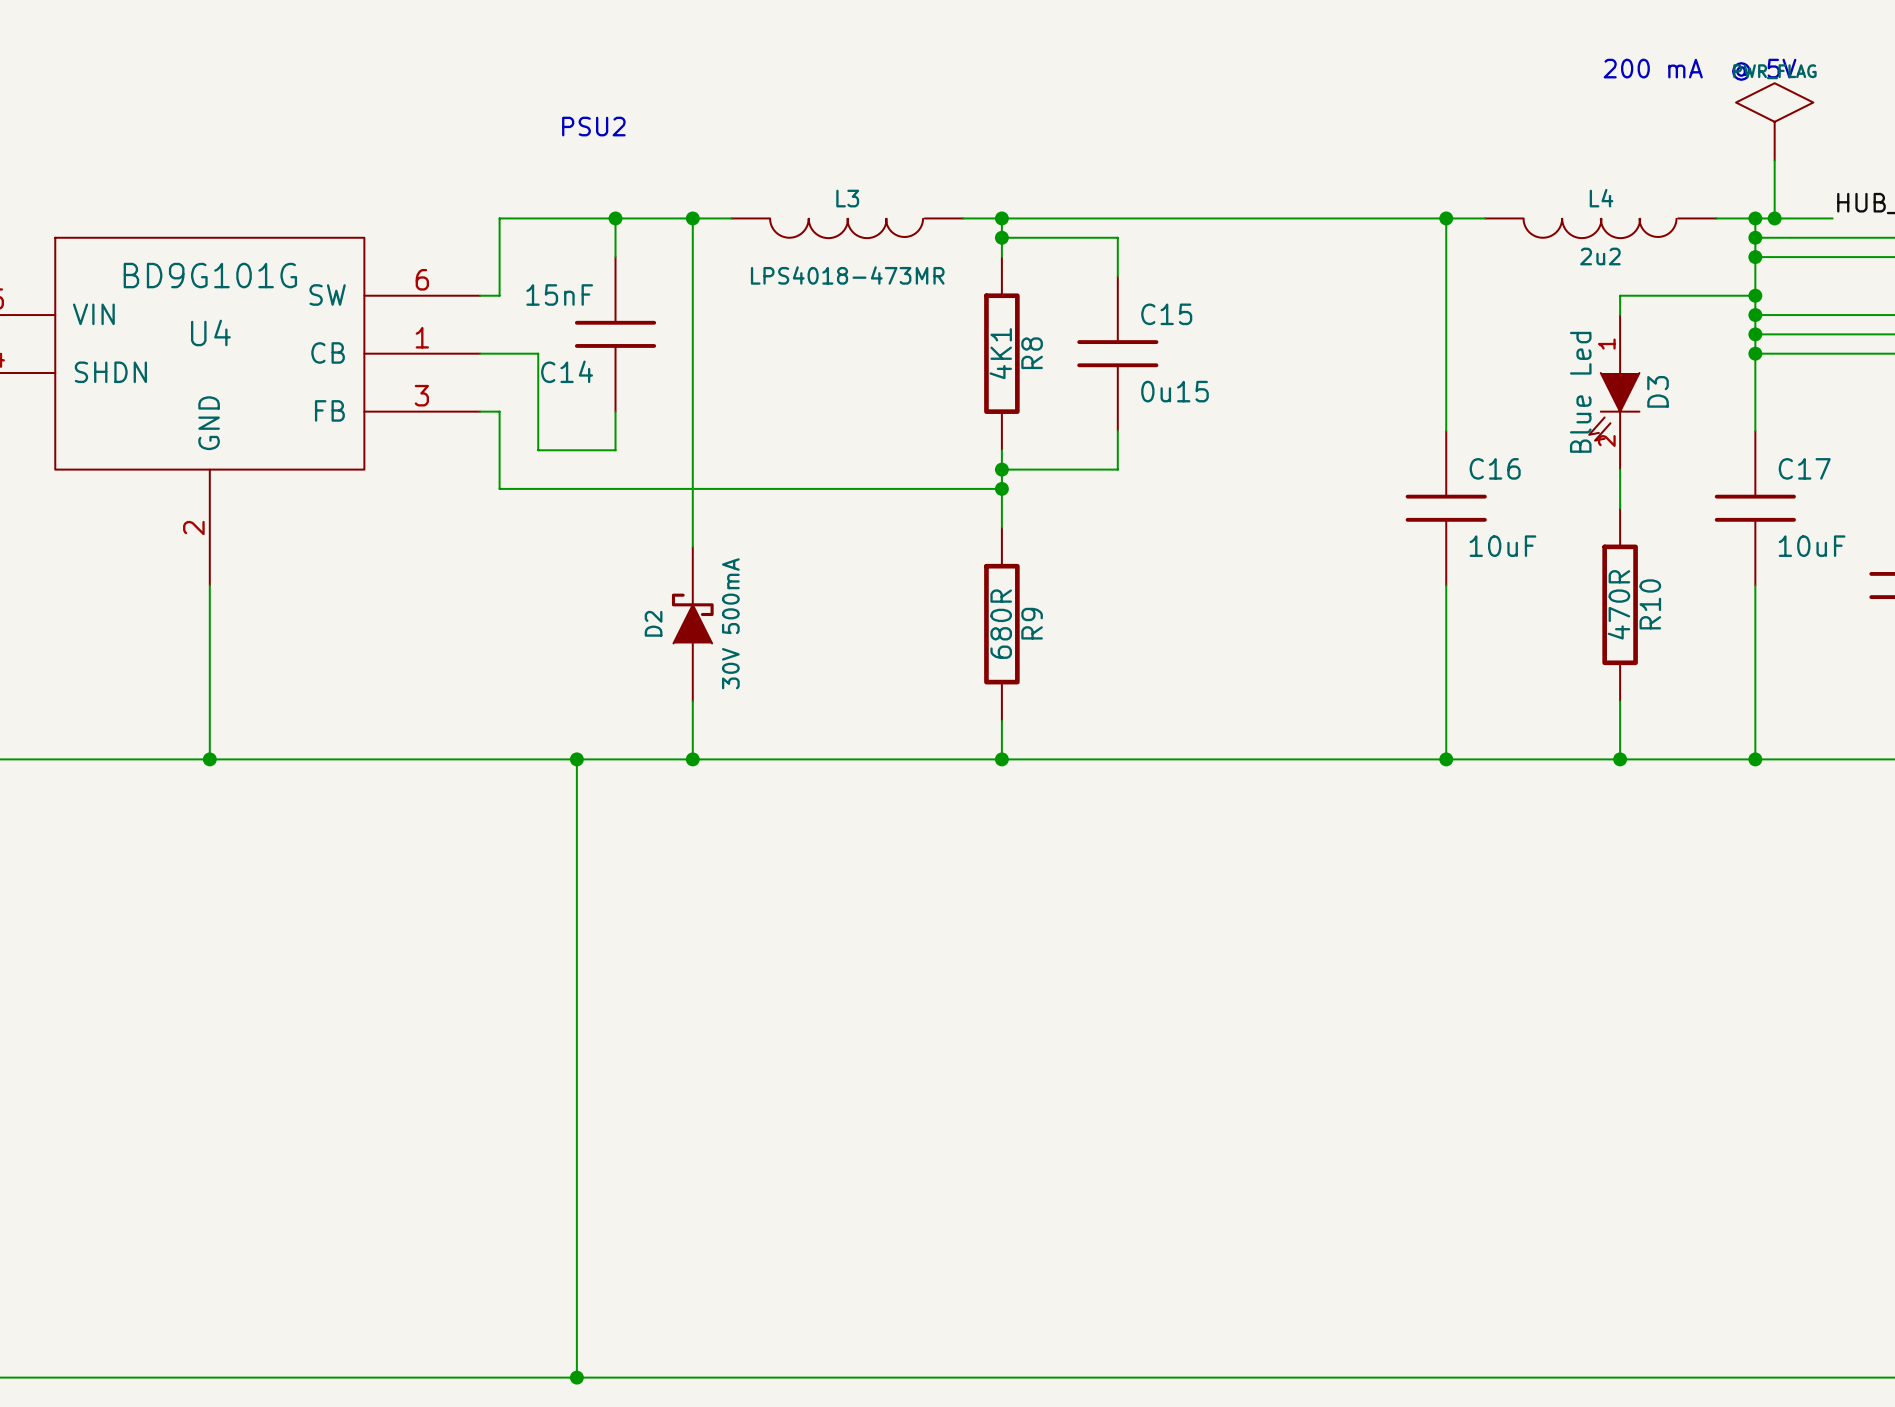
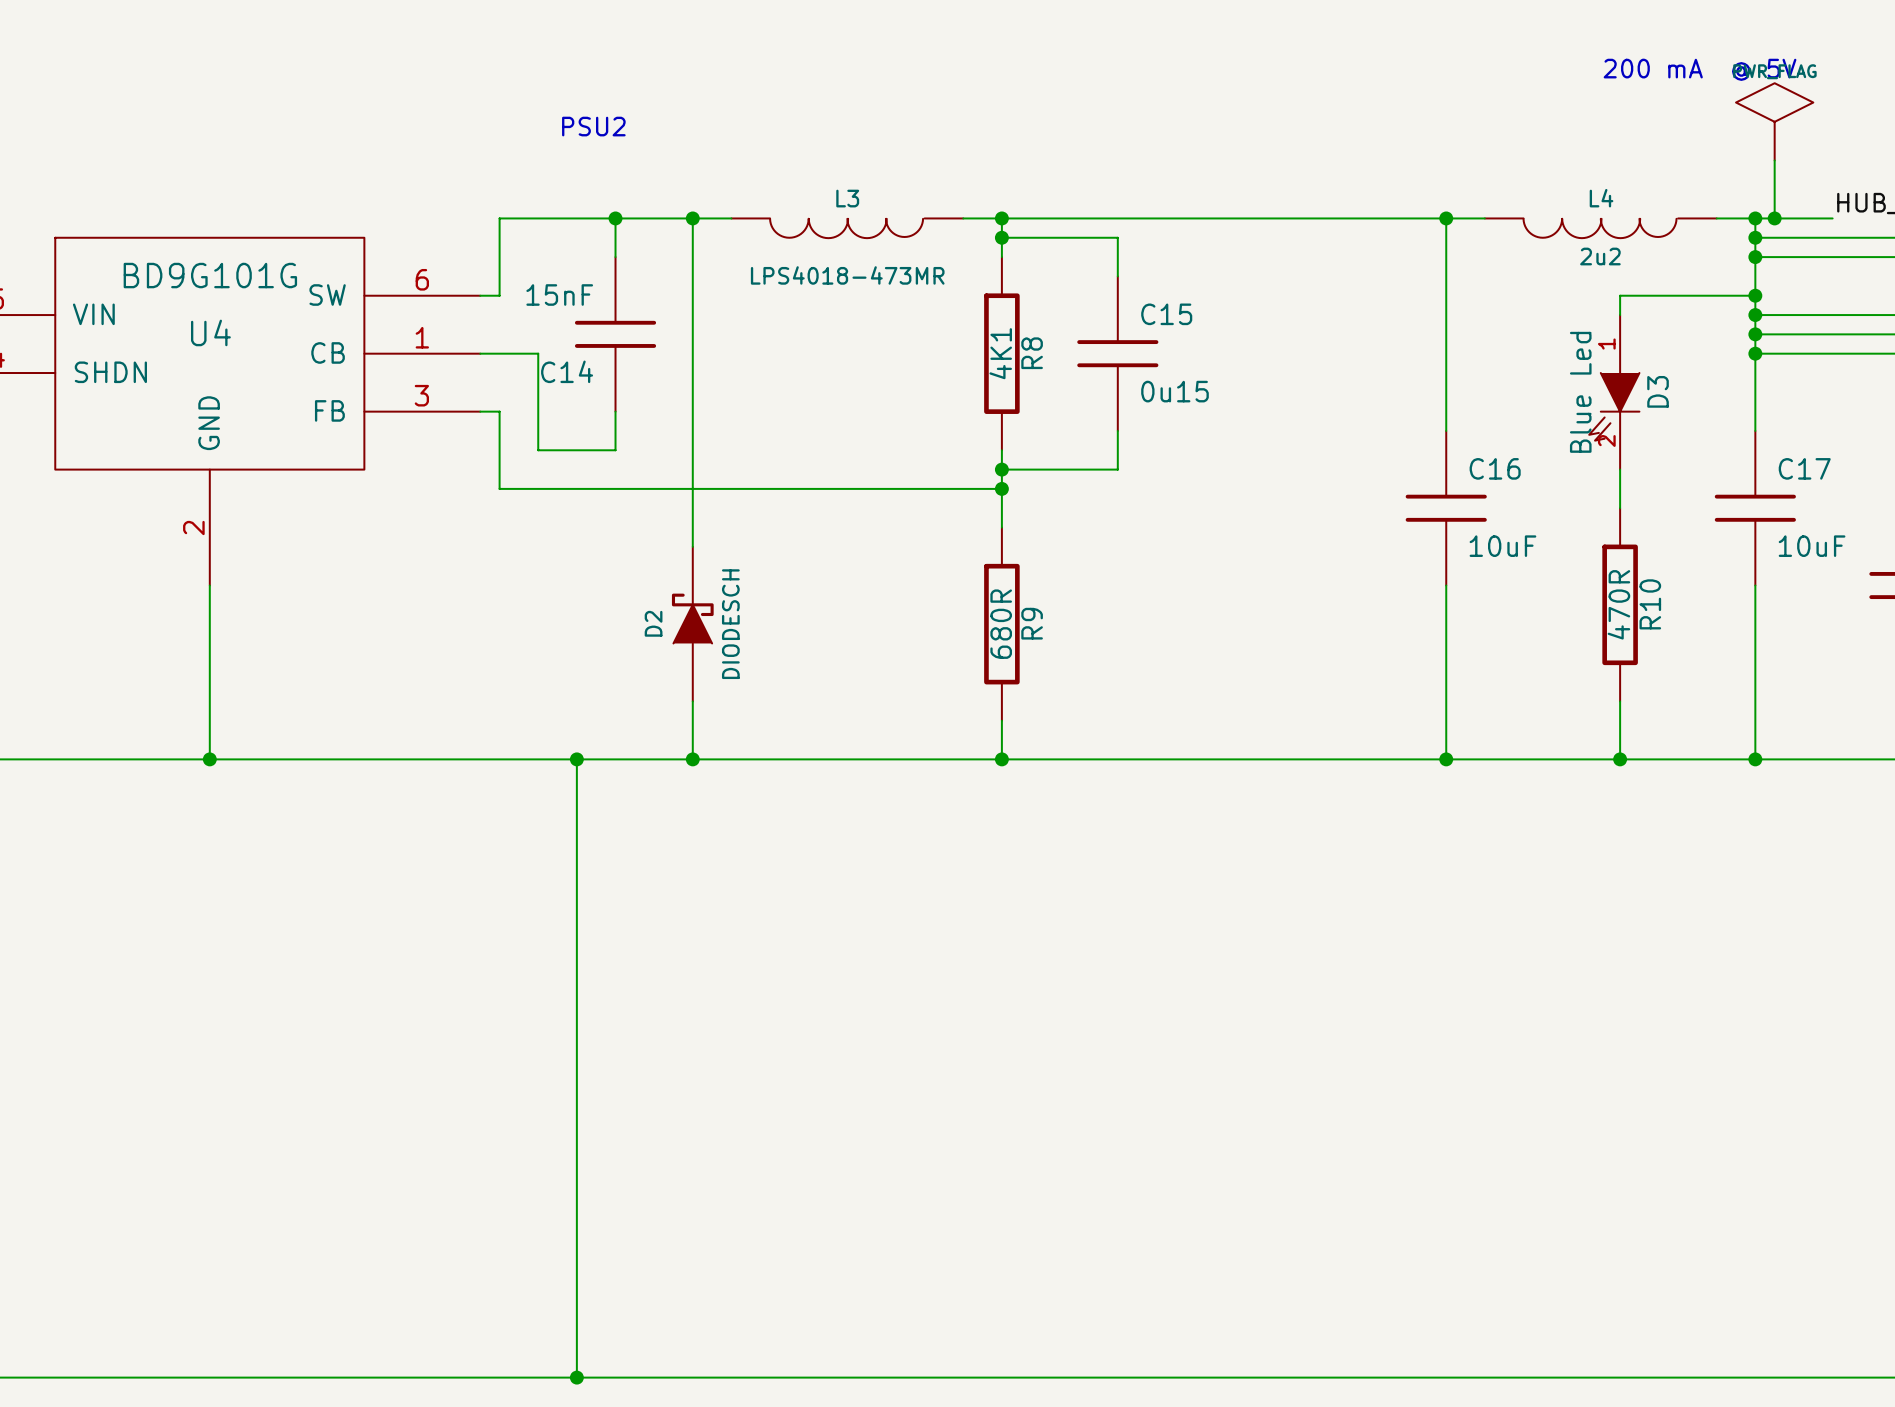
D2 value: 30V 500mA (730, 623) -> DIODESCH (730, 624)

